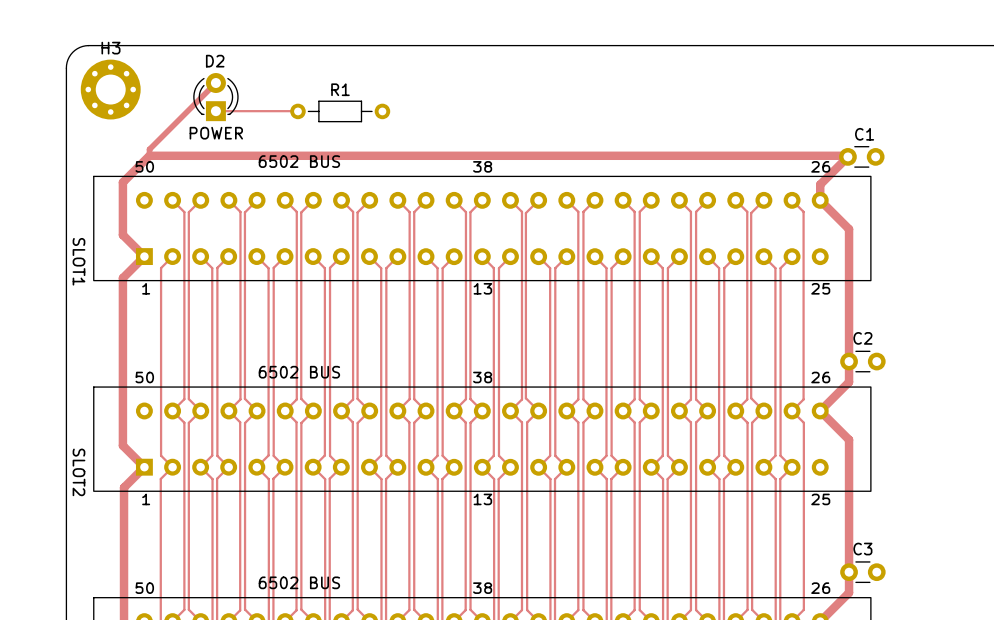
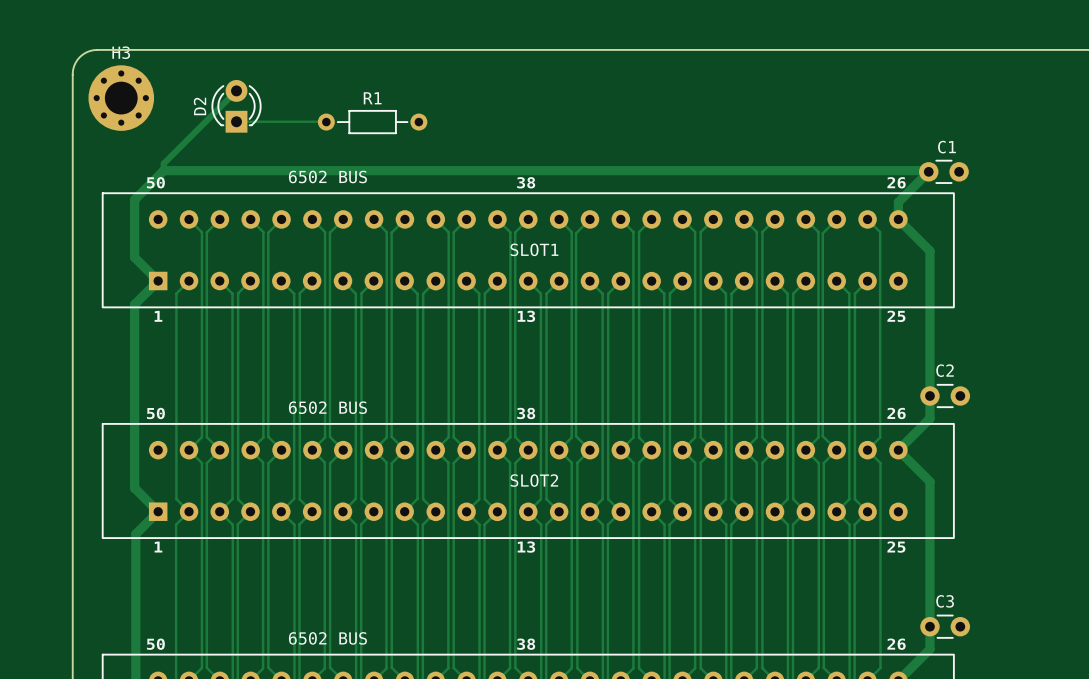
D2 name rotation: 0° (215, 61) -> 90° counterclockwise (200, 106)
D2 name position: D2 (215, 61) -> D2 (200, 106)
D2 value: POWER (216, 133) -> none
SLOT1 name rotation: 0° (78, 261) -> 90° counterclockwise (534, 249)
SLOT1 name position: SLOT1 (78, 261) -> SLOT1 (534, 249)
SLOT2 name rotation: 0° (78, 472) -> 90° counterclockwise (534, 480)
SLOT2 name position: SLOT2 (78, 472) -> SLOT2 (534, 480)

